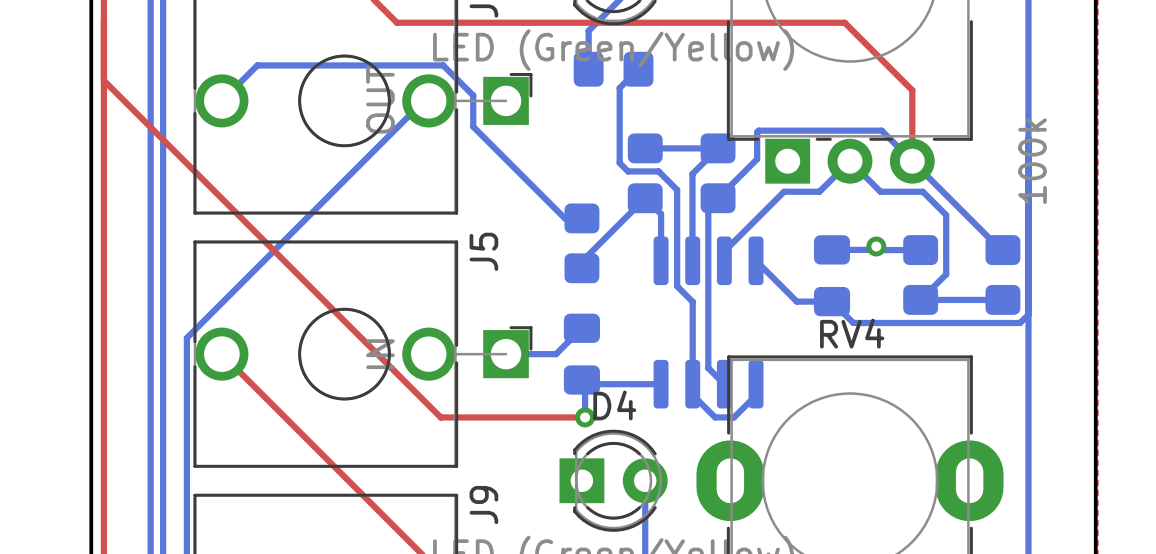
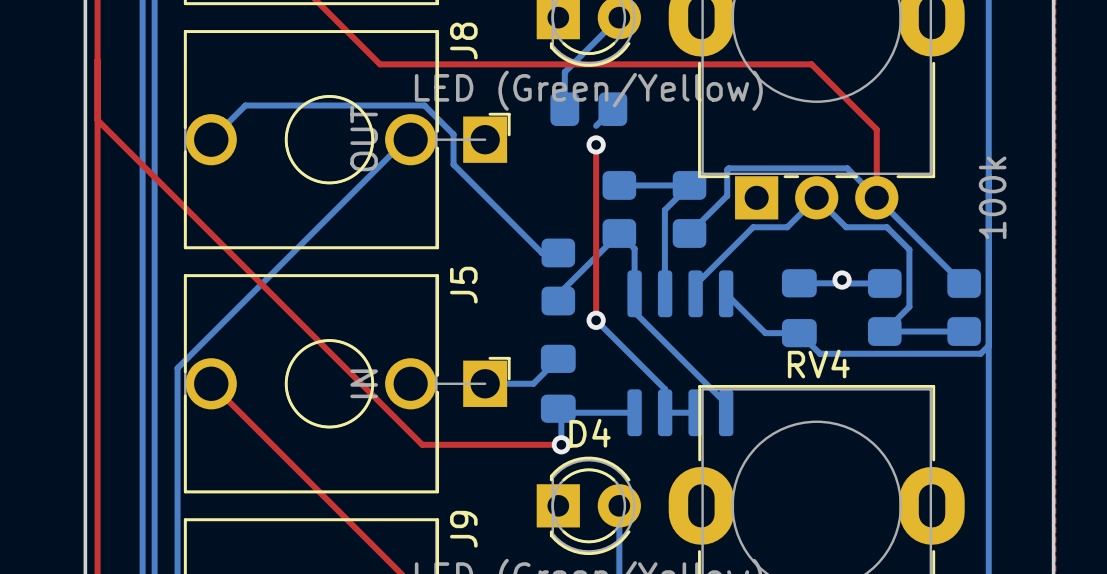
bottom track: (621, 86) (619, 163) (628, 171) (658, 171) (677, 189) (677, 286) (692, 301) (692, 359) -> (596, 320) (665, 389)
top track: none -> (596, 144) (596, 320)
via: none -> (596, 144)
bottom track: (718, 198) (708, 207) (708, 368) (724, 384) -> none
bottom track: none -> (634, 293) (634, 312) (726, 403) (726, 412)
via: none -> (596, 320)
bottom track: (692, 384) (692, 394) (715, 417) (734, 417) (756, 395) (756, 384) -> (665, 412) (695, 412)

